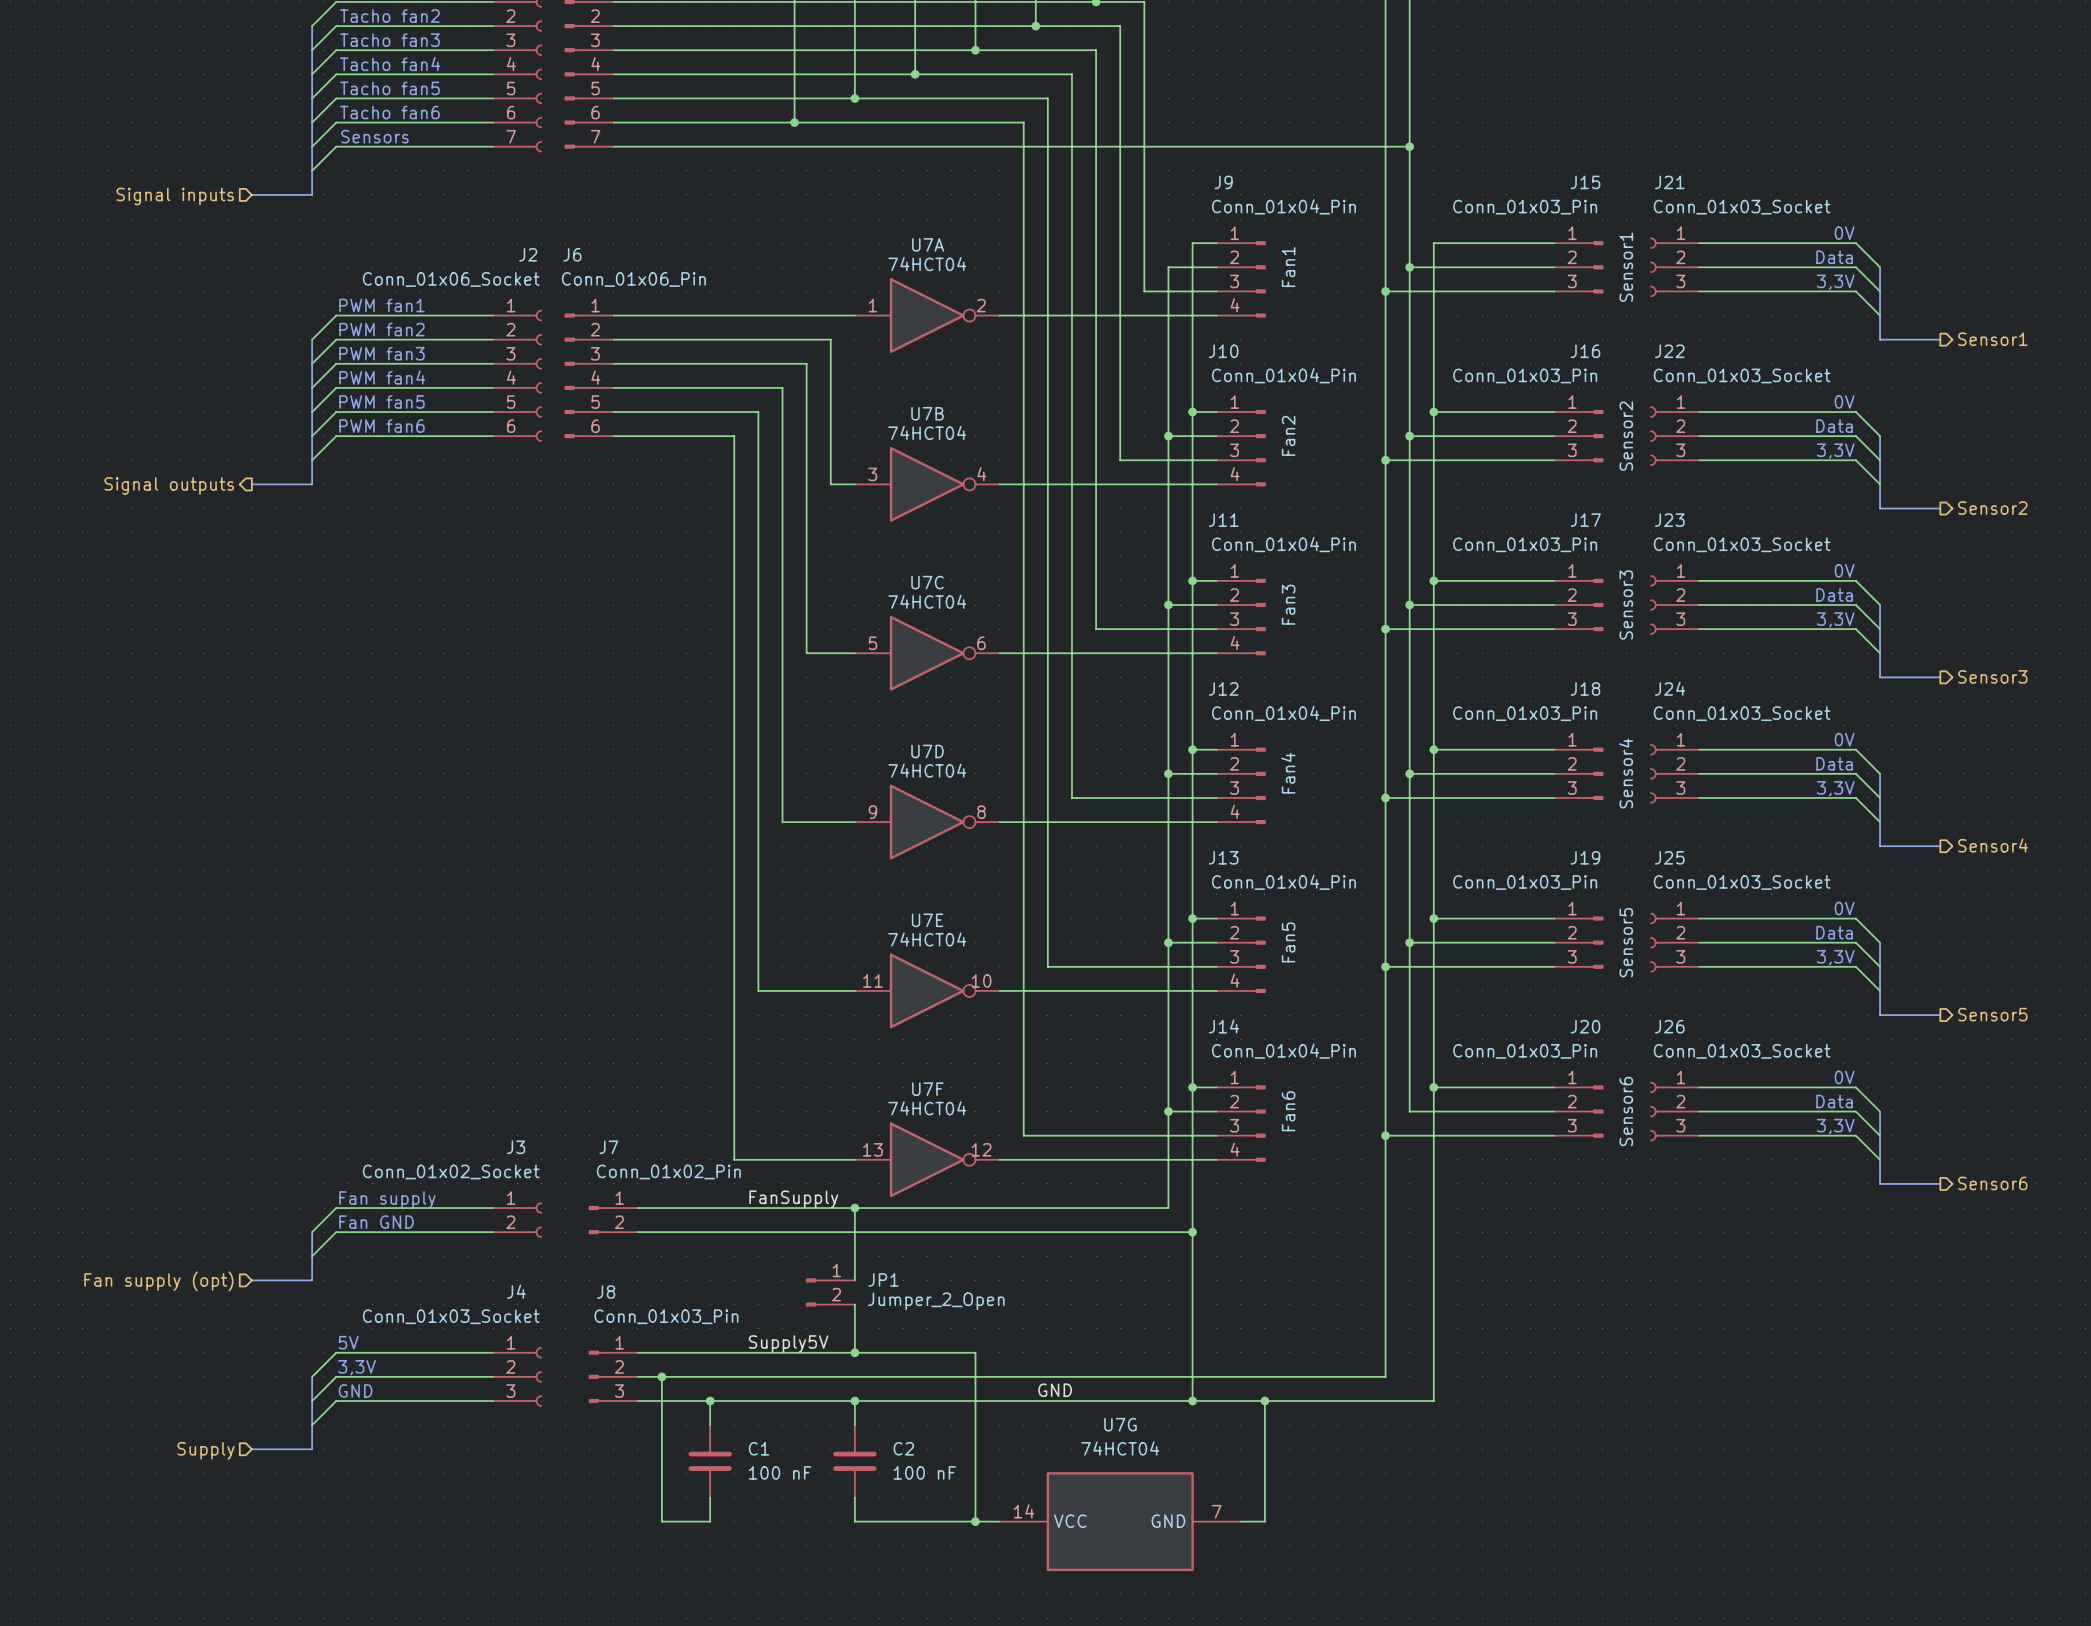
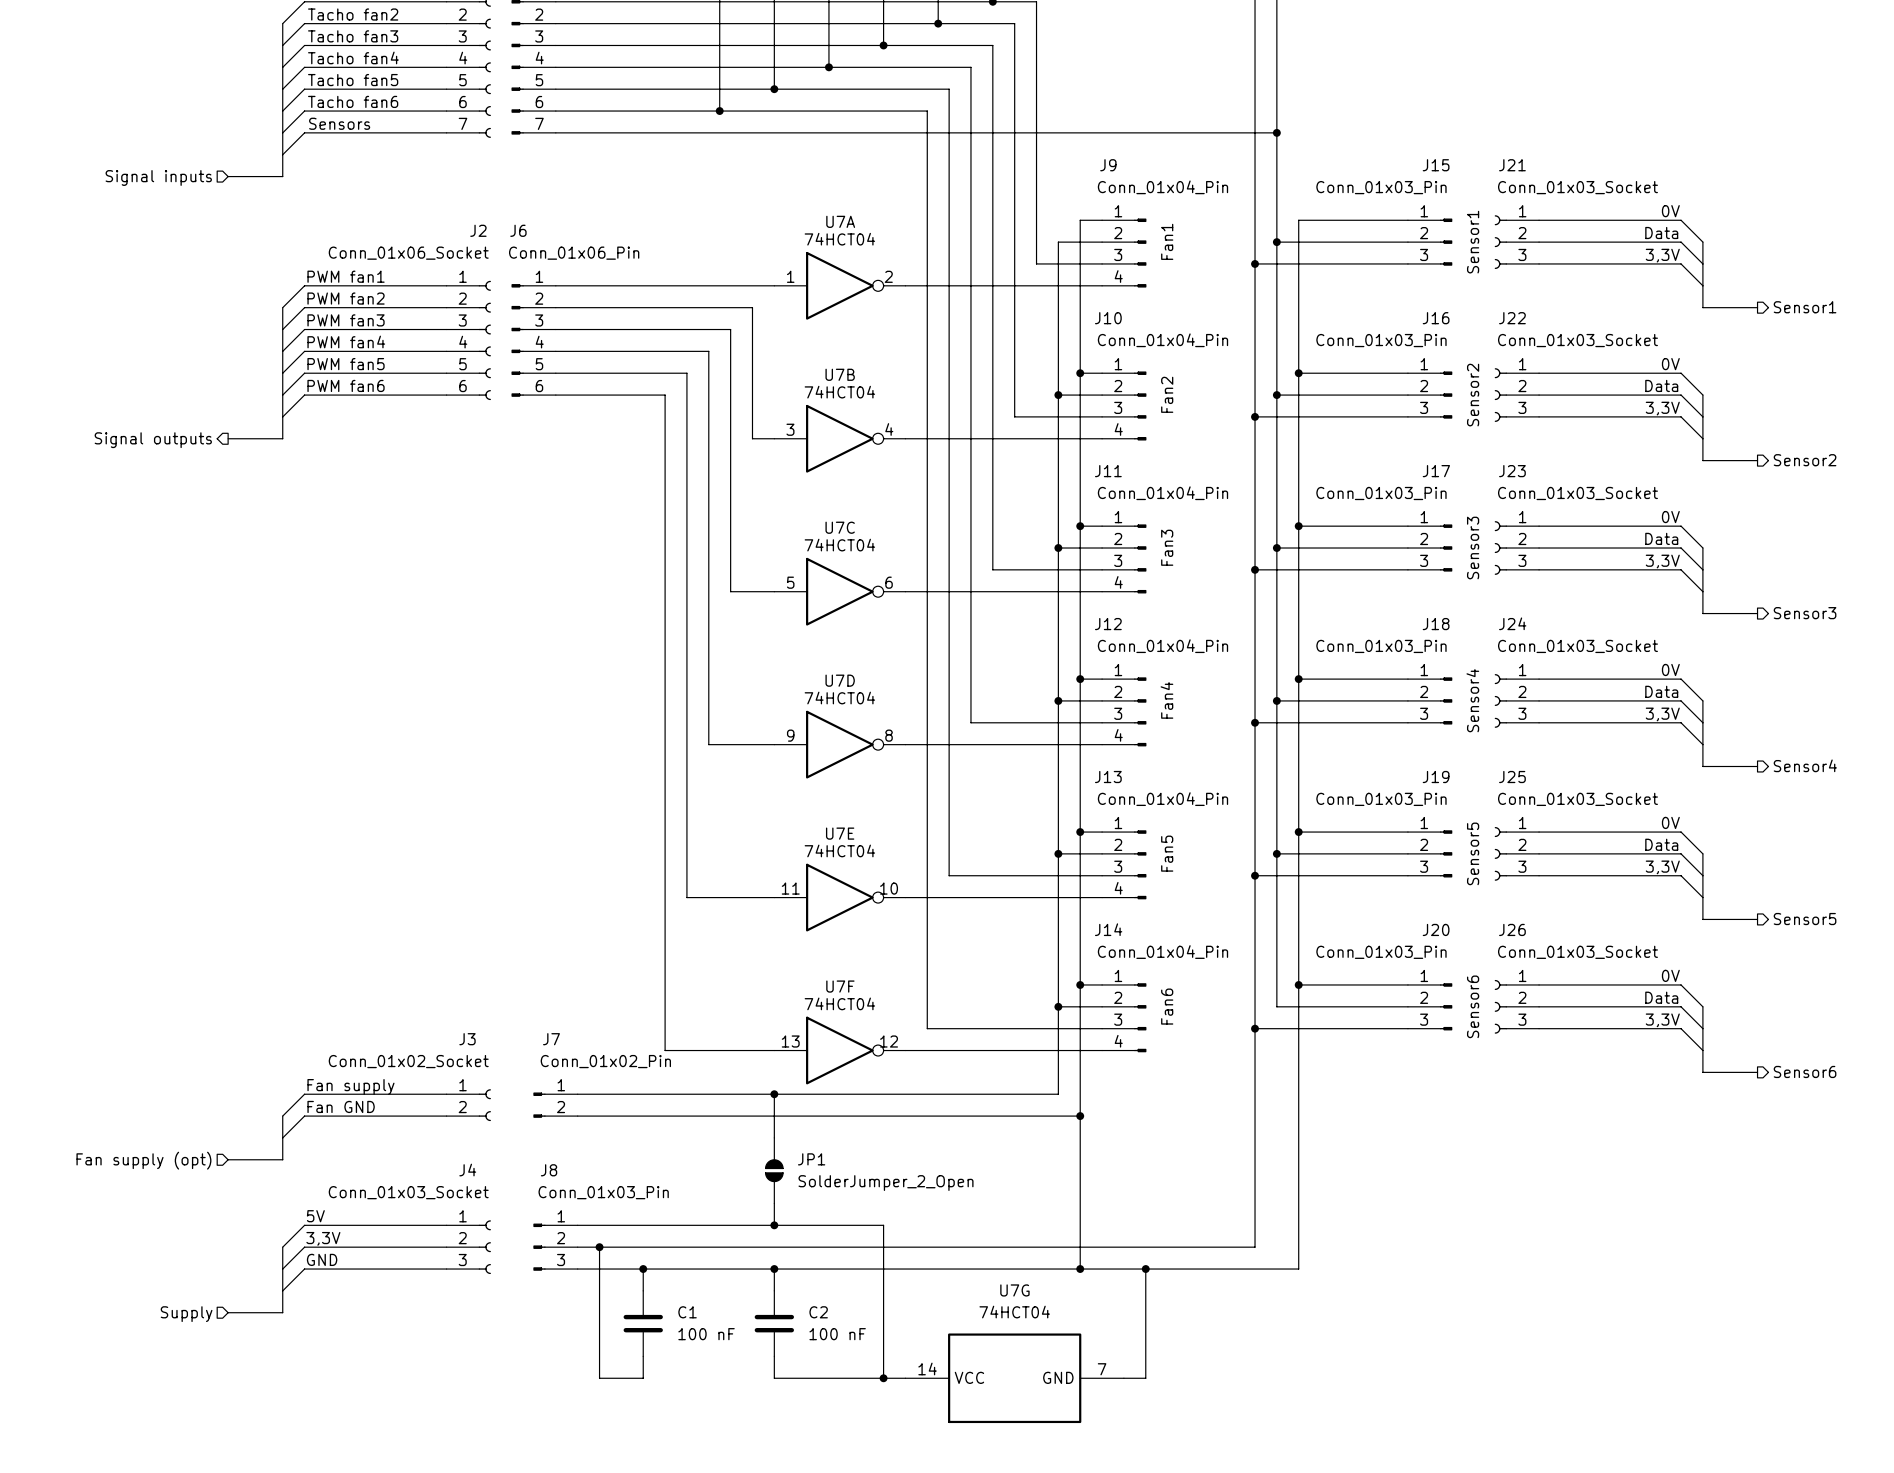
label: FanSupply (793, 1199) -> none
JP1 symbol: [805, 1278, 855, 1307] -> [765, 1137, 784, 1204]
JP1 value: Jumper_2_Open (936, 1301) -> SolderJumper_2_Open (886, 1183)
label: Supply5V (788, 1344) -> none
label: GND (1055, 1390) -> none

